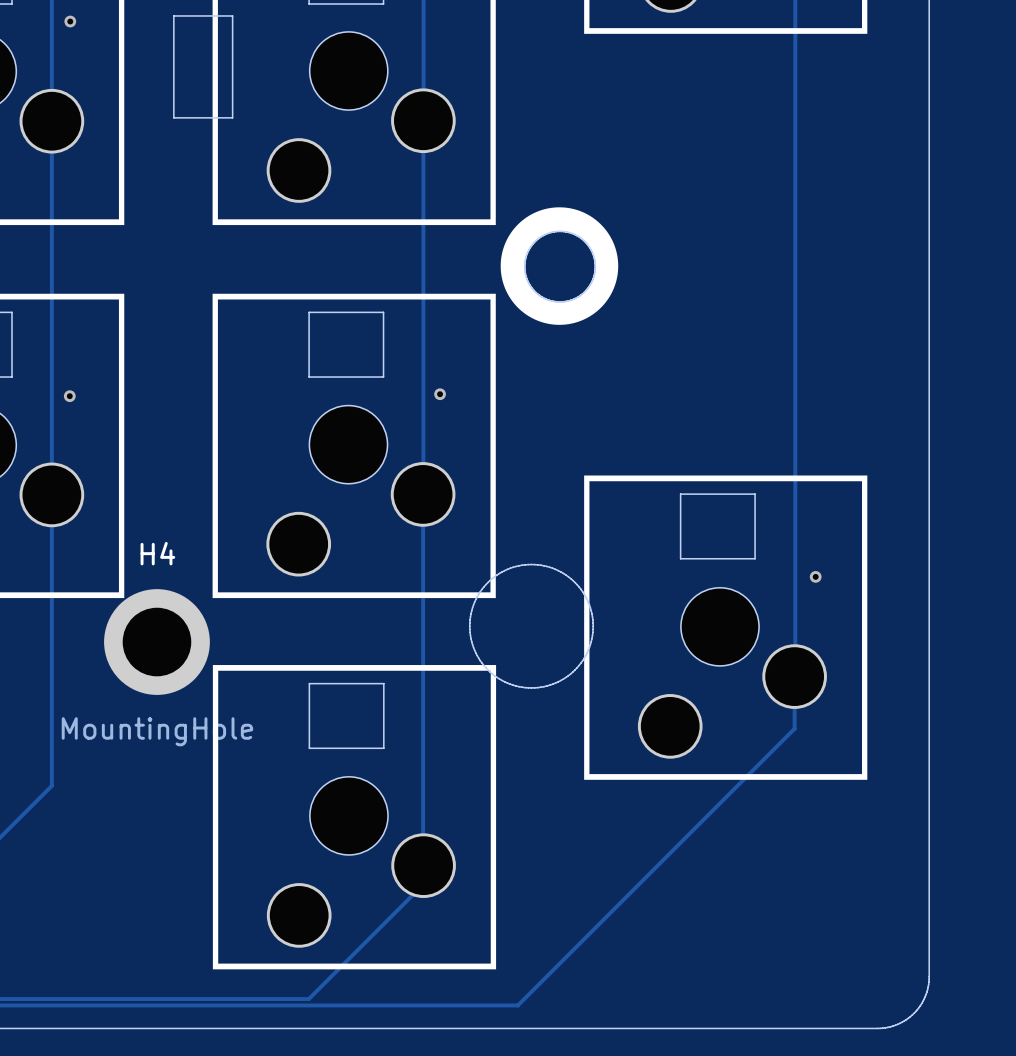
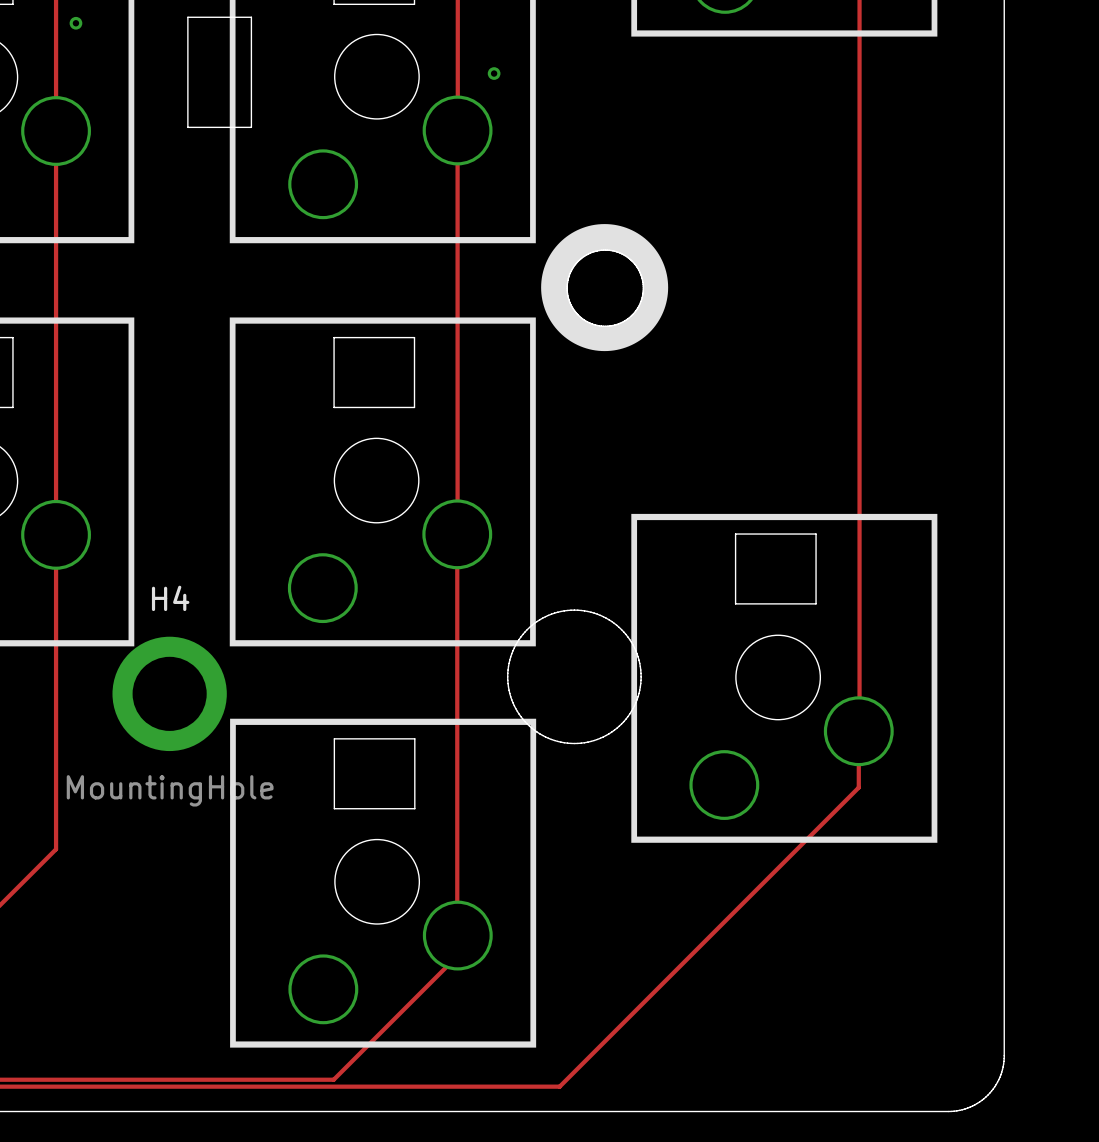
via: none -> (494, 73)
via: (440, 394) -> none
via: (69, 396) -> none
via: (815, 576) -> none

